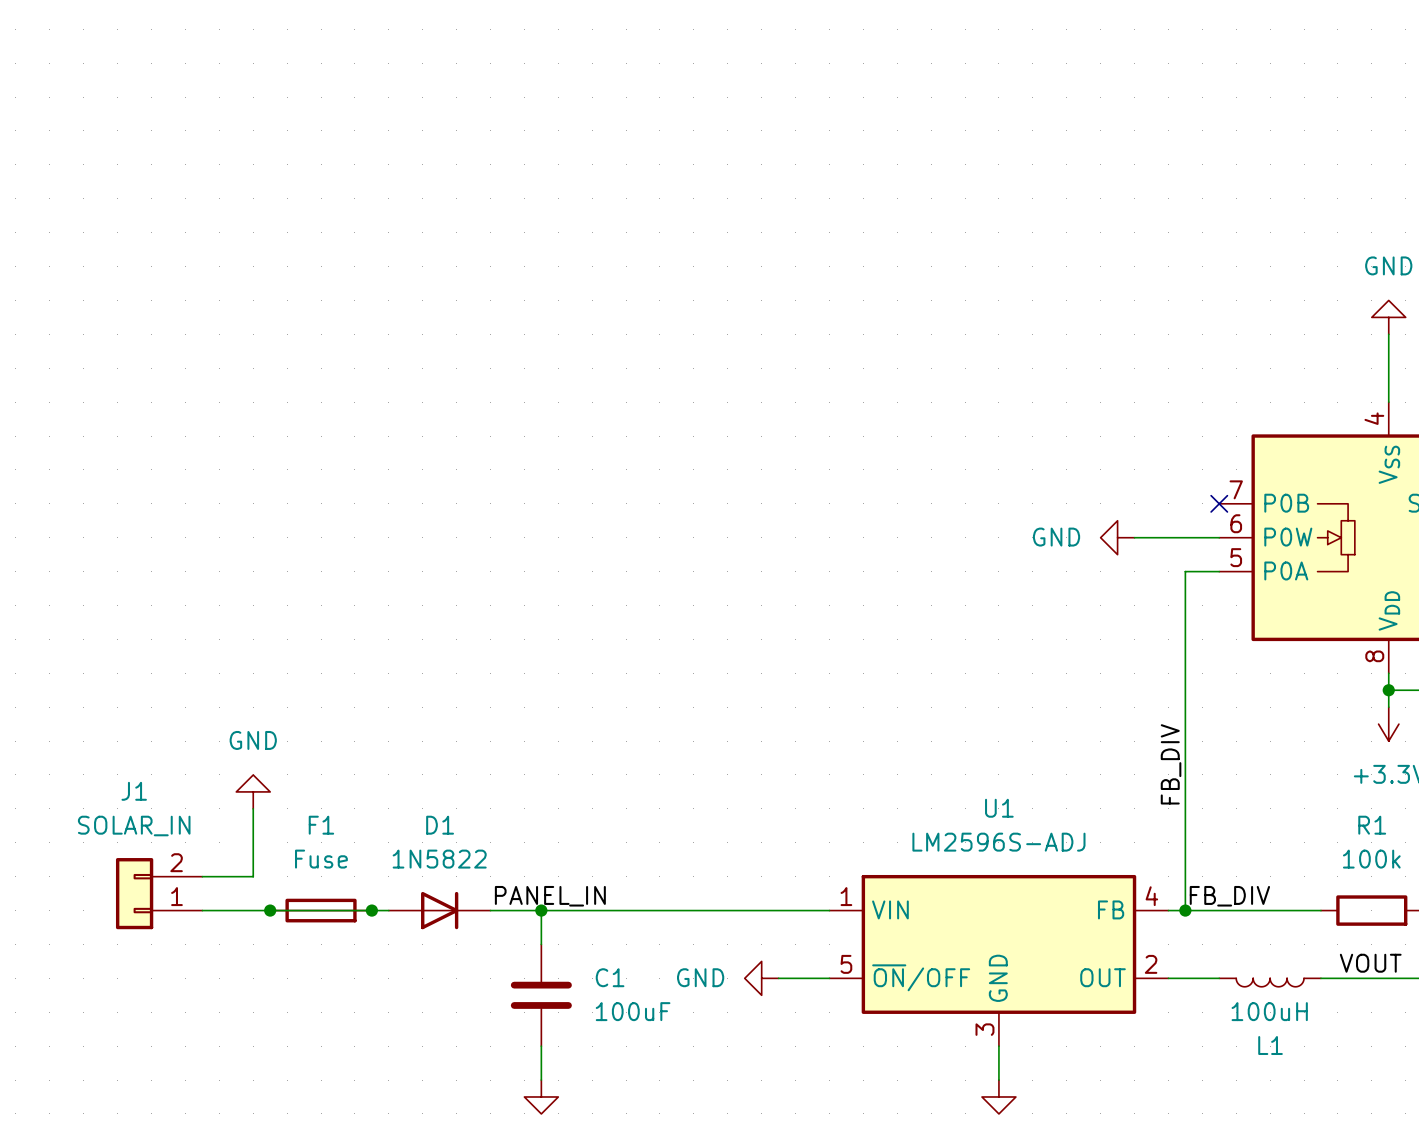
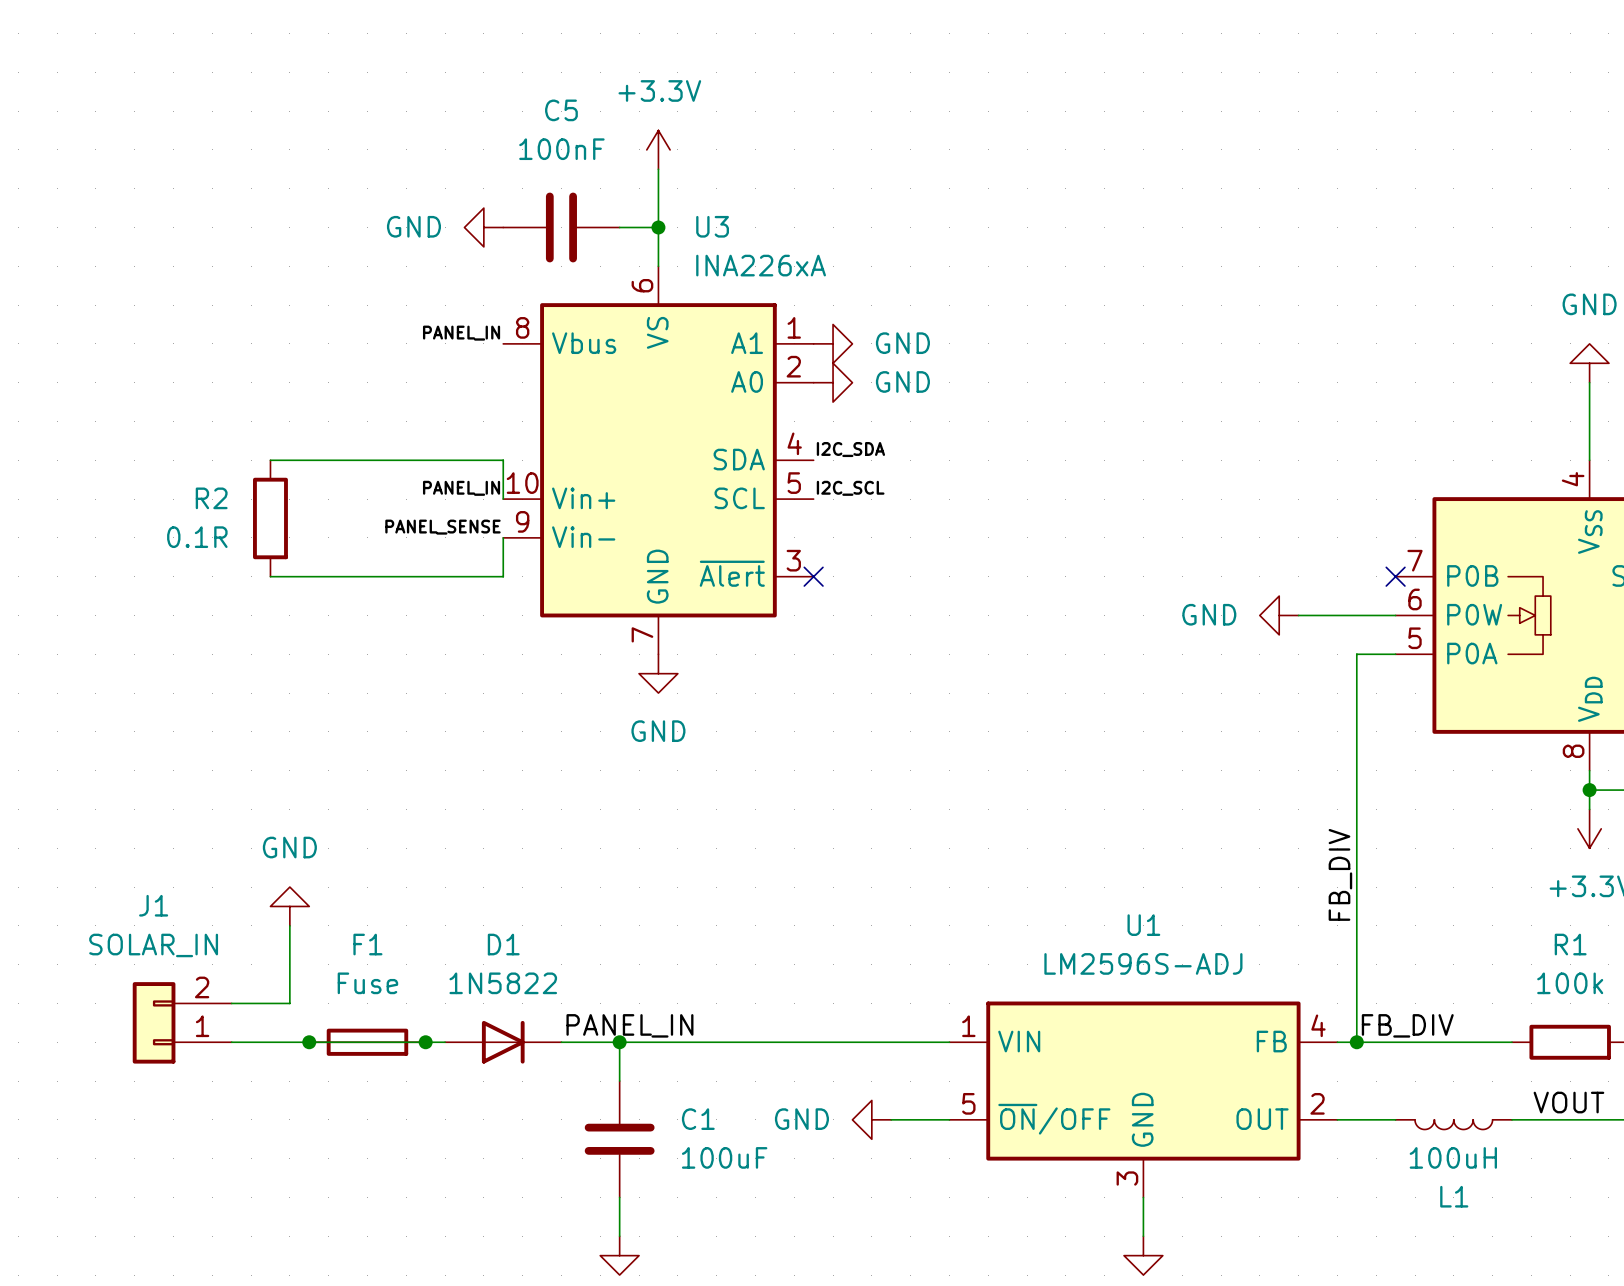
power symbol: none -> +3.3V (658, 149)
wire: none -> (658, 169) (658, 266)
power symbol: none -> GND (483, 227)
C5: none -> 100nF (561, 227)
wire: none -> (619, 227) (658, 227)
junction: none -> (658, 227)
label: none -> PANEL_IN (461, 333)
power symbol: none -> GND (833, 343)
power symbol: none -> GND (833, 382)
label: none -> I2C_SDA (850, 449)
wire: none -> (270, 460) (503, 460) (503, 499)
U3: none -> INA226xA (658, 460)
label: none -> PANEL_IN (461, 488)
label: none -> I2C_SCL (850, 488)
R2: none -> 0.1R (270, 518)
label: none -> PANEL_SENSE (442, 527)
wire: none -> (503, 537) (503, 576) (270, 576)
no-connect mark: none -> (813, 576)
power symbol: none -> GND (658, 673)

